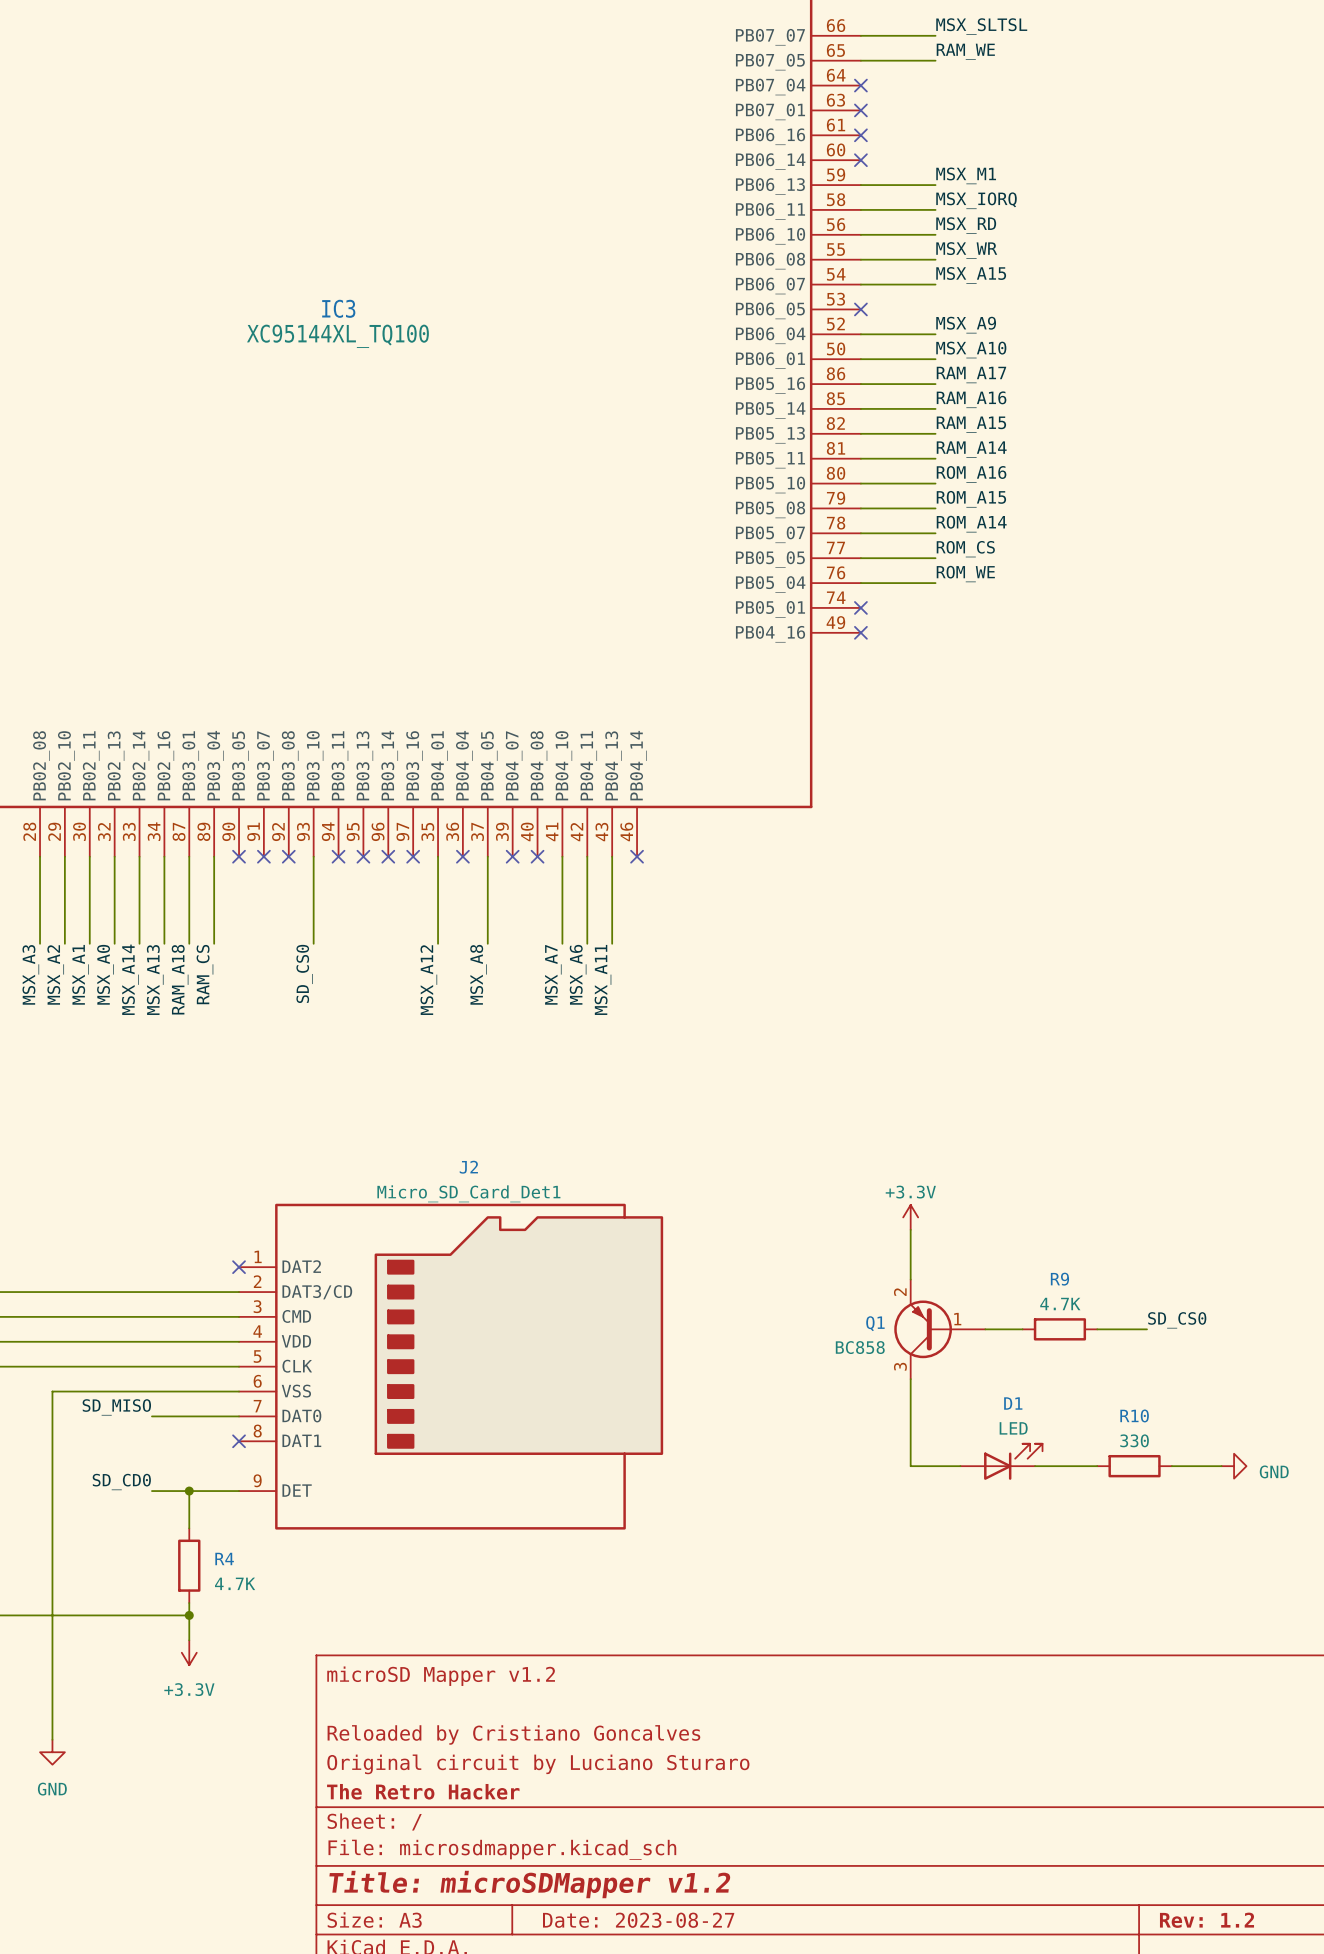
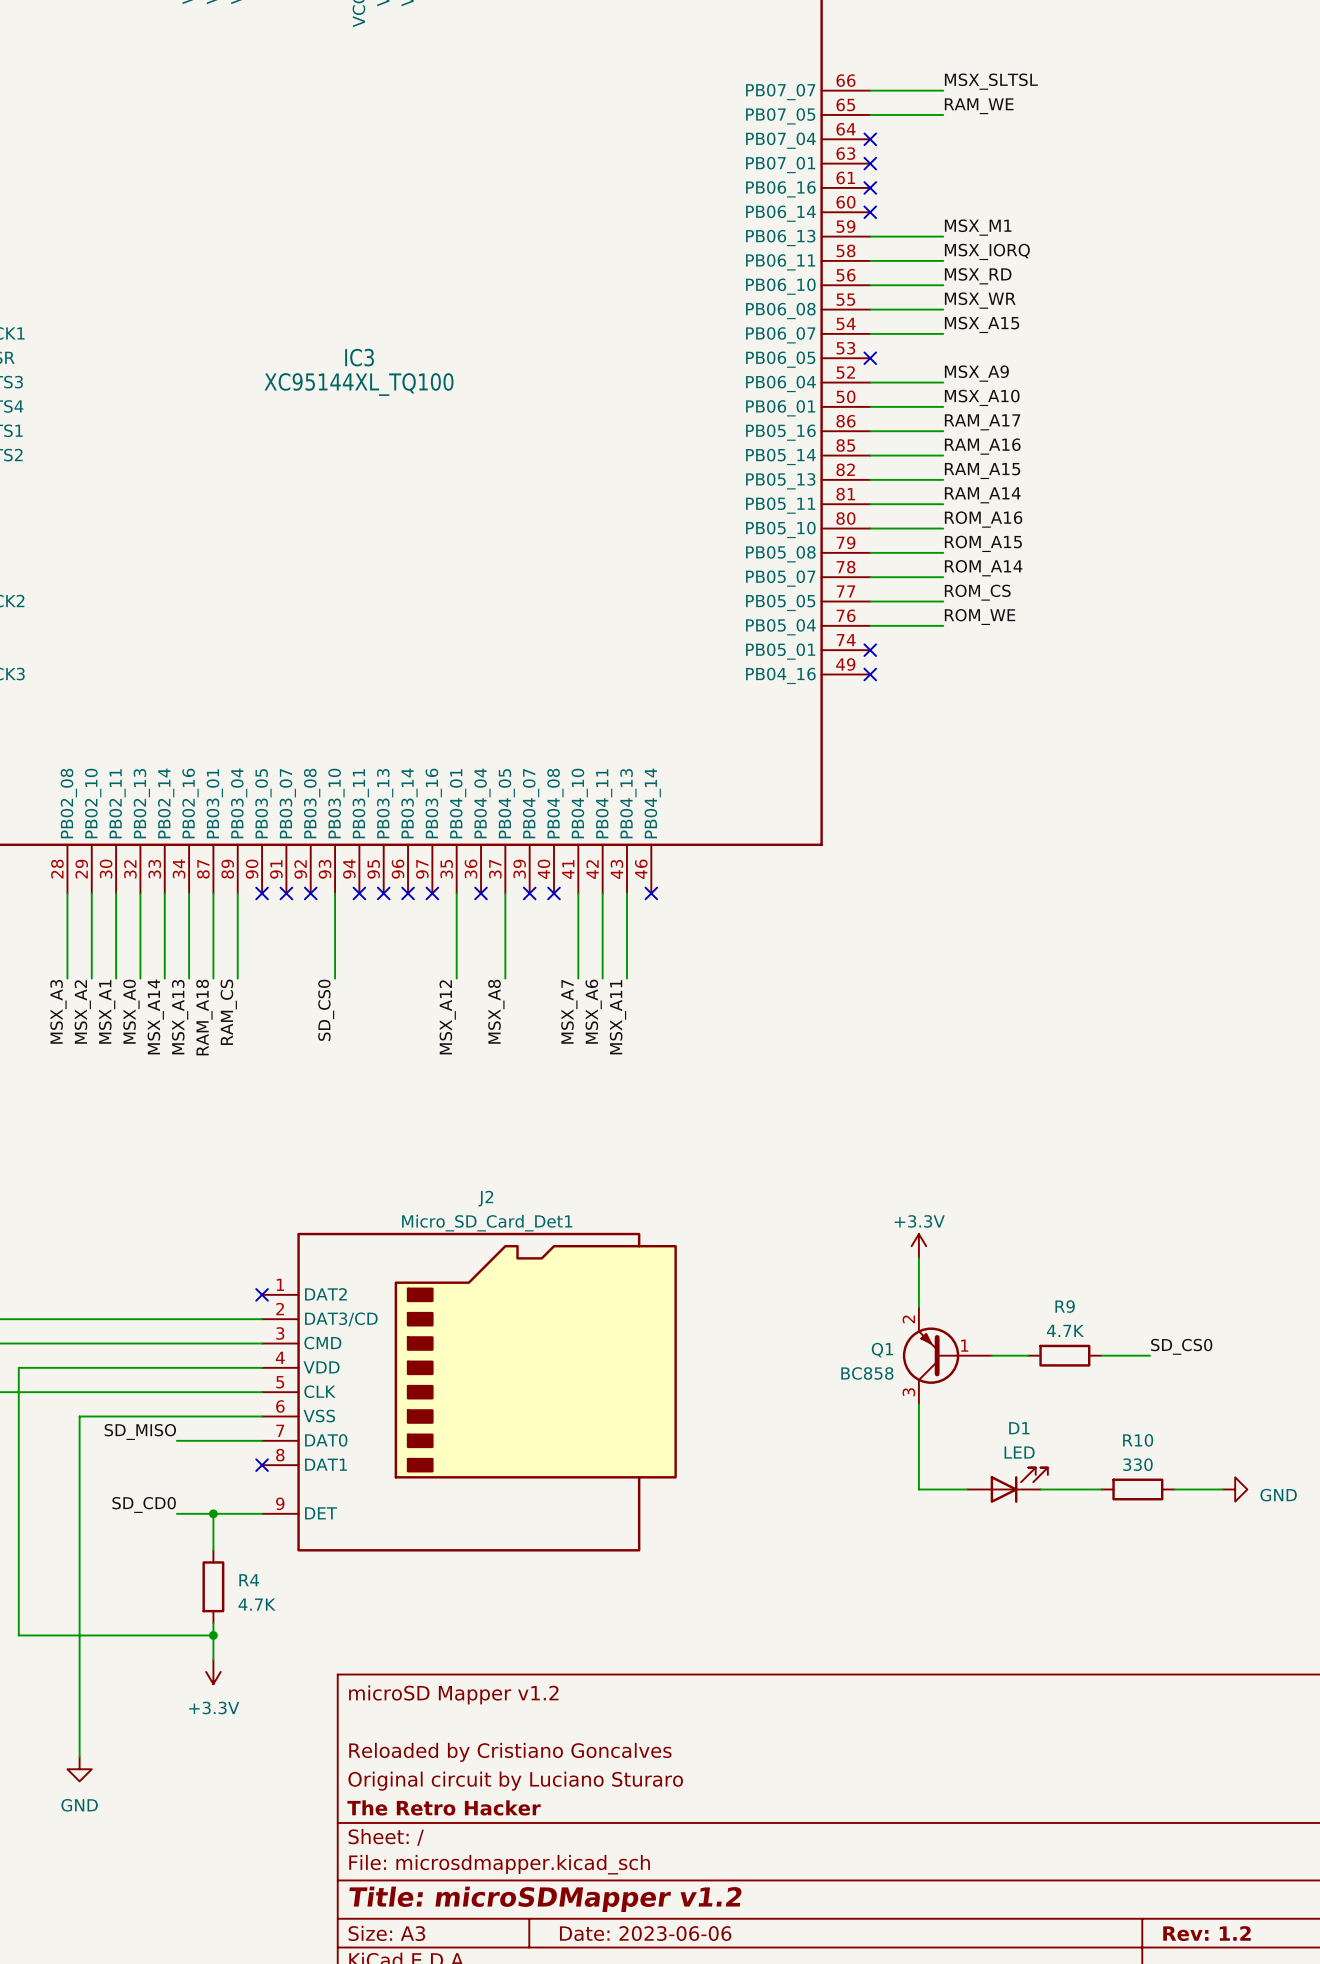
title block: Date: 2023-08-27 (638, 1920) -> Date: 2023-06-06 (645, 1933)

